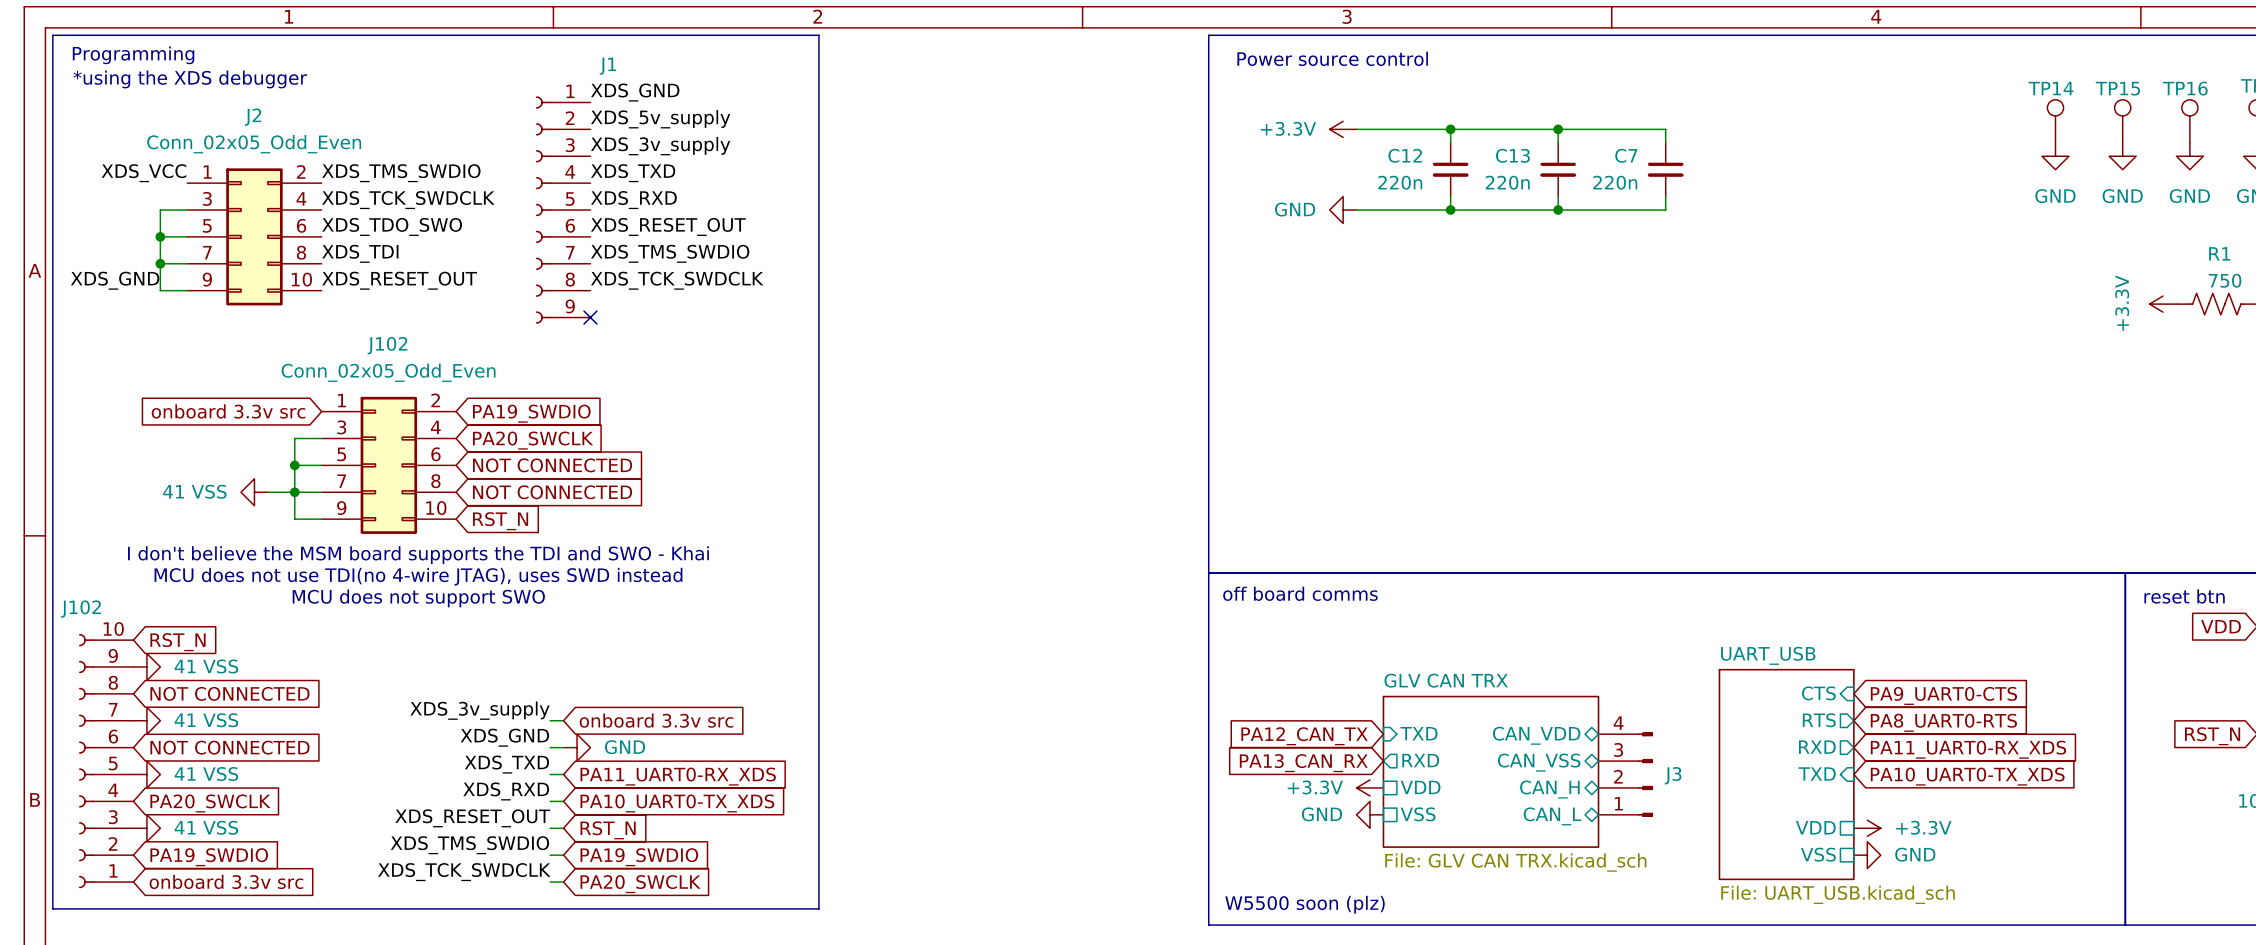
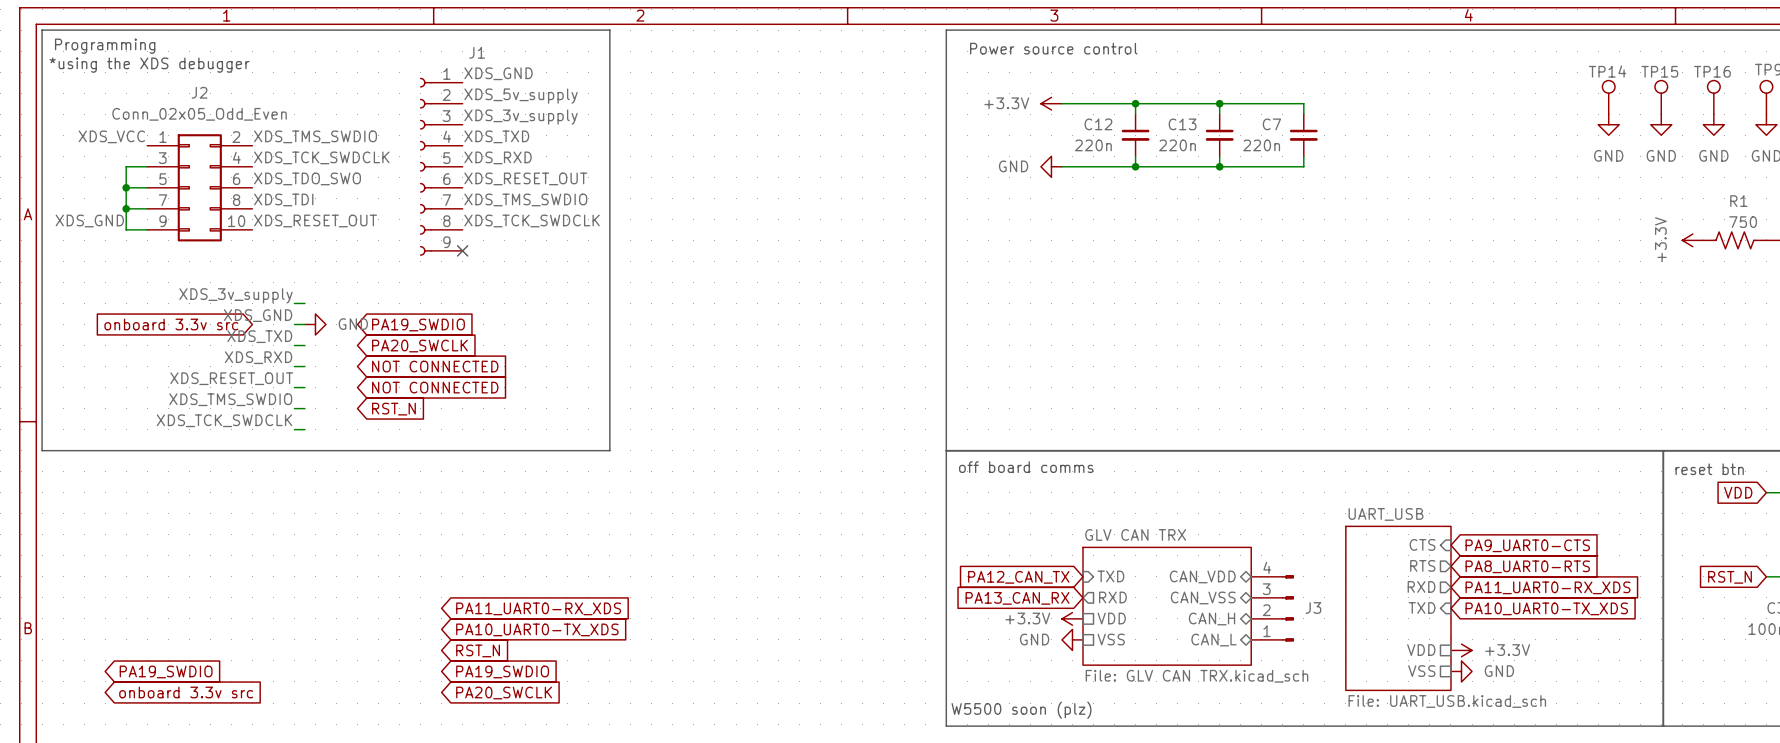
line: (778, 35) (818, 35) (818, 908) (52, 908) (52, 572) -> (609, 30) (609, 450) (42, 450)
label: none -> XDS_3v_supply (236, 295)
wire: none -> (294, 303) (304, 303)
label: none -> XDS_GND (258, 315)
power symbol: none -> GND (315, 324)
label: none -> XDS_TXD (259, 336)
wire: (321, 438) (294, 438) (294, 519) (321, 519) -> none
label: none -> XDS_RXD (258, 357)
wire: (294, 465) (321, 465) -> none
junction: (294, 465) -> none
J102: Conn_02x05_Odd_Even (388, 465) -> none
label: none -> XDS_RESET_OUT (231, 378)
power symbol: 41 VSS (254, 492) -> none
wire: (267, 492) (321, 492) -> none
junction: (294, 492) -> none
label: none -> XDS_TMS_SWDIO (230, 399)
label: none -> XDS_TCK_SWDCLK (224, 420)
text: I don't believe the MSM board supports the TDI and SWO - Khai (418, 555) -> none
text: MCU does not use TDI(no 4-wire JTAG), uses SWD instead (418, 576) -> none
text: MCU does not support SWO (418, 598) -> none
global label: RST_N (178, 642) -> none
power symbol: 41 VSS (146, 666) -> none
global label: NOT CONNECTED (229, 693) -> none
label: XDS_3v_supply (479, 710) -> none
power symbol: 41 VSS (146, 720) -> none
wire: (550, 720) (563, 720) -> (294, 429) (304, 429)
global label: onboard 3.3v src (656, 720) -> none
label: XDS_GND (504, 737) -> none
global label: NOT CONNECTED (229, 747) -> none
wire: (550, 747) (563, 747) -> none
power symbol: GND (577, 747) -> none
J102: (106, 761) -> none
label: XDS_TXD (506, 764) -> none
power symbol: 41 VSS (146, 774) -> none
wire: (550, 774) (563, 774) -> none
label: XDS_RXD (506, 791) -> none
wire: (550, 801) (563, 801) -> none
global label: PA20_SWCLK (210, 803) -> none
label: XDS_RESET_OUT (472, 818) -> none
power symbol: 41 VSS (146, 828) -> none
wire: (550, 828) (563, 828) -> none
label: XDS_TMS_SWDIO (469, 845) -> none
wire: (550, 855) (563, 855) -> none
label: XDS_TCK_SWDCLK (464, 872) -> none
wire: (550, 882) (563, 882) -> none

